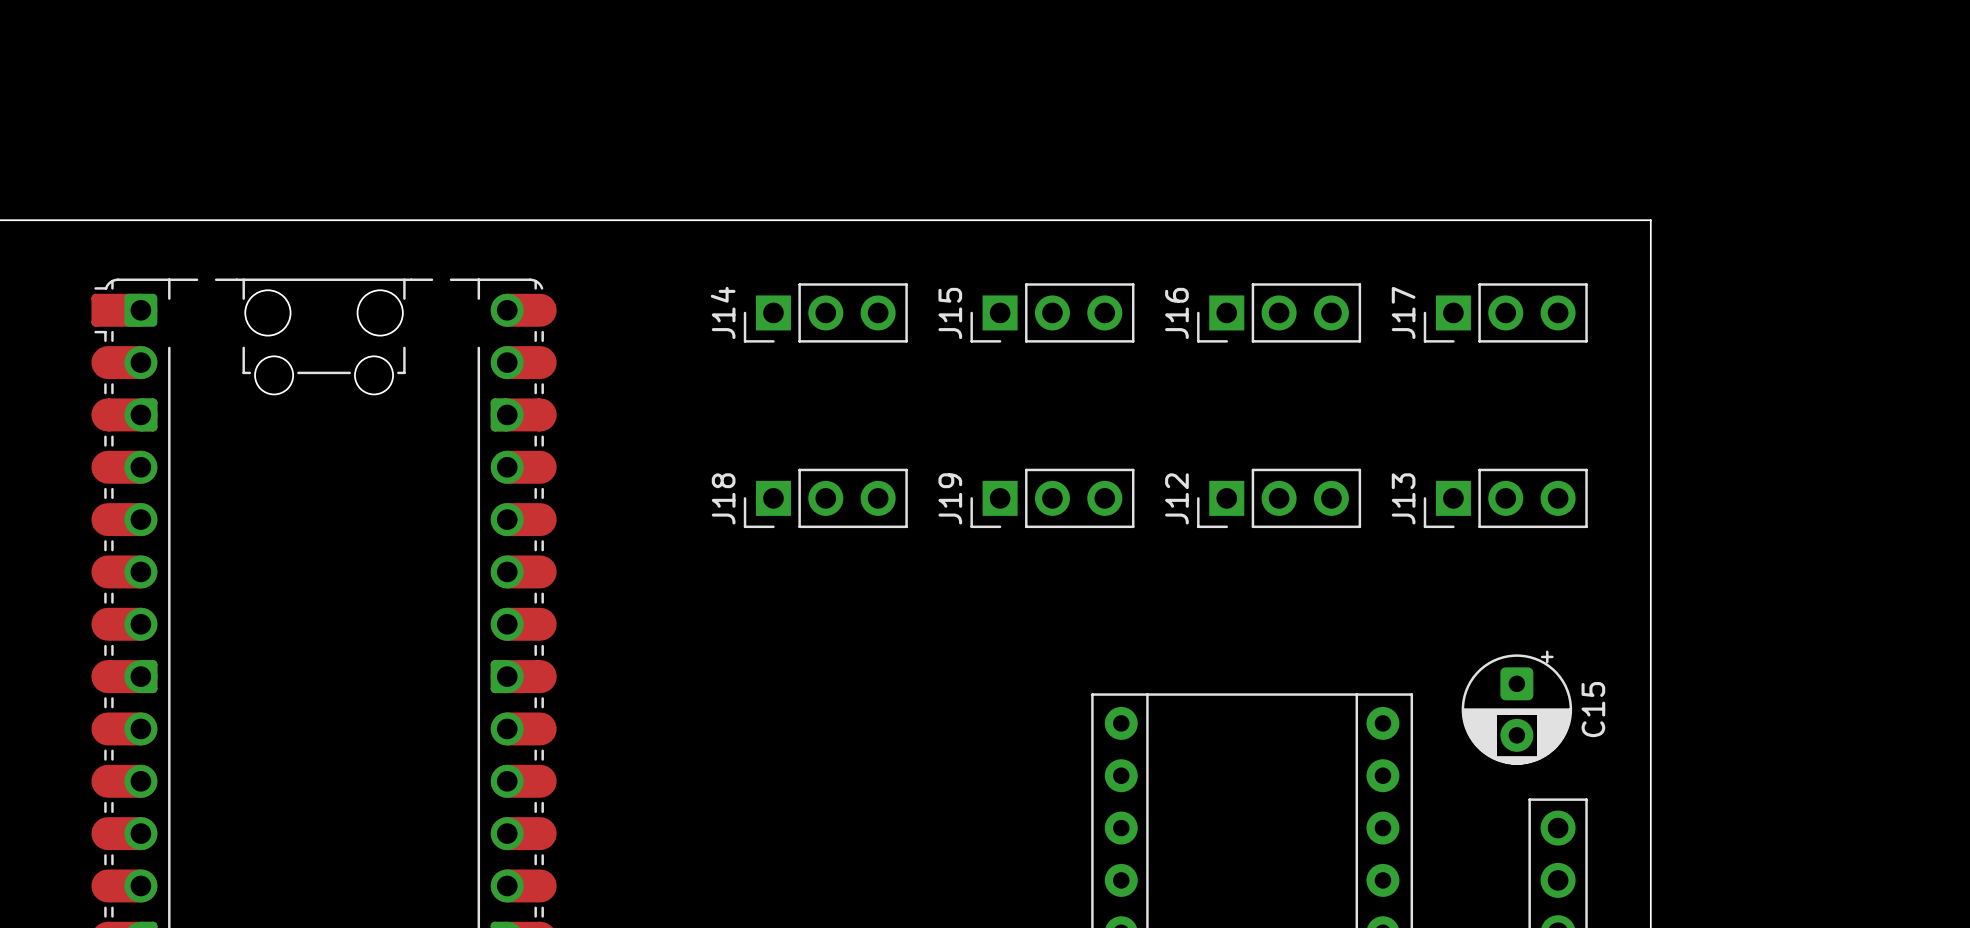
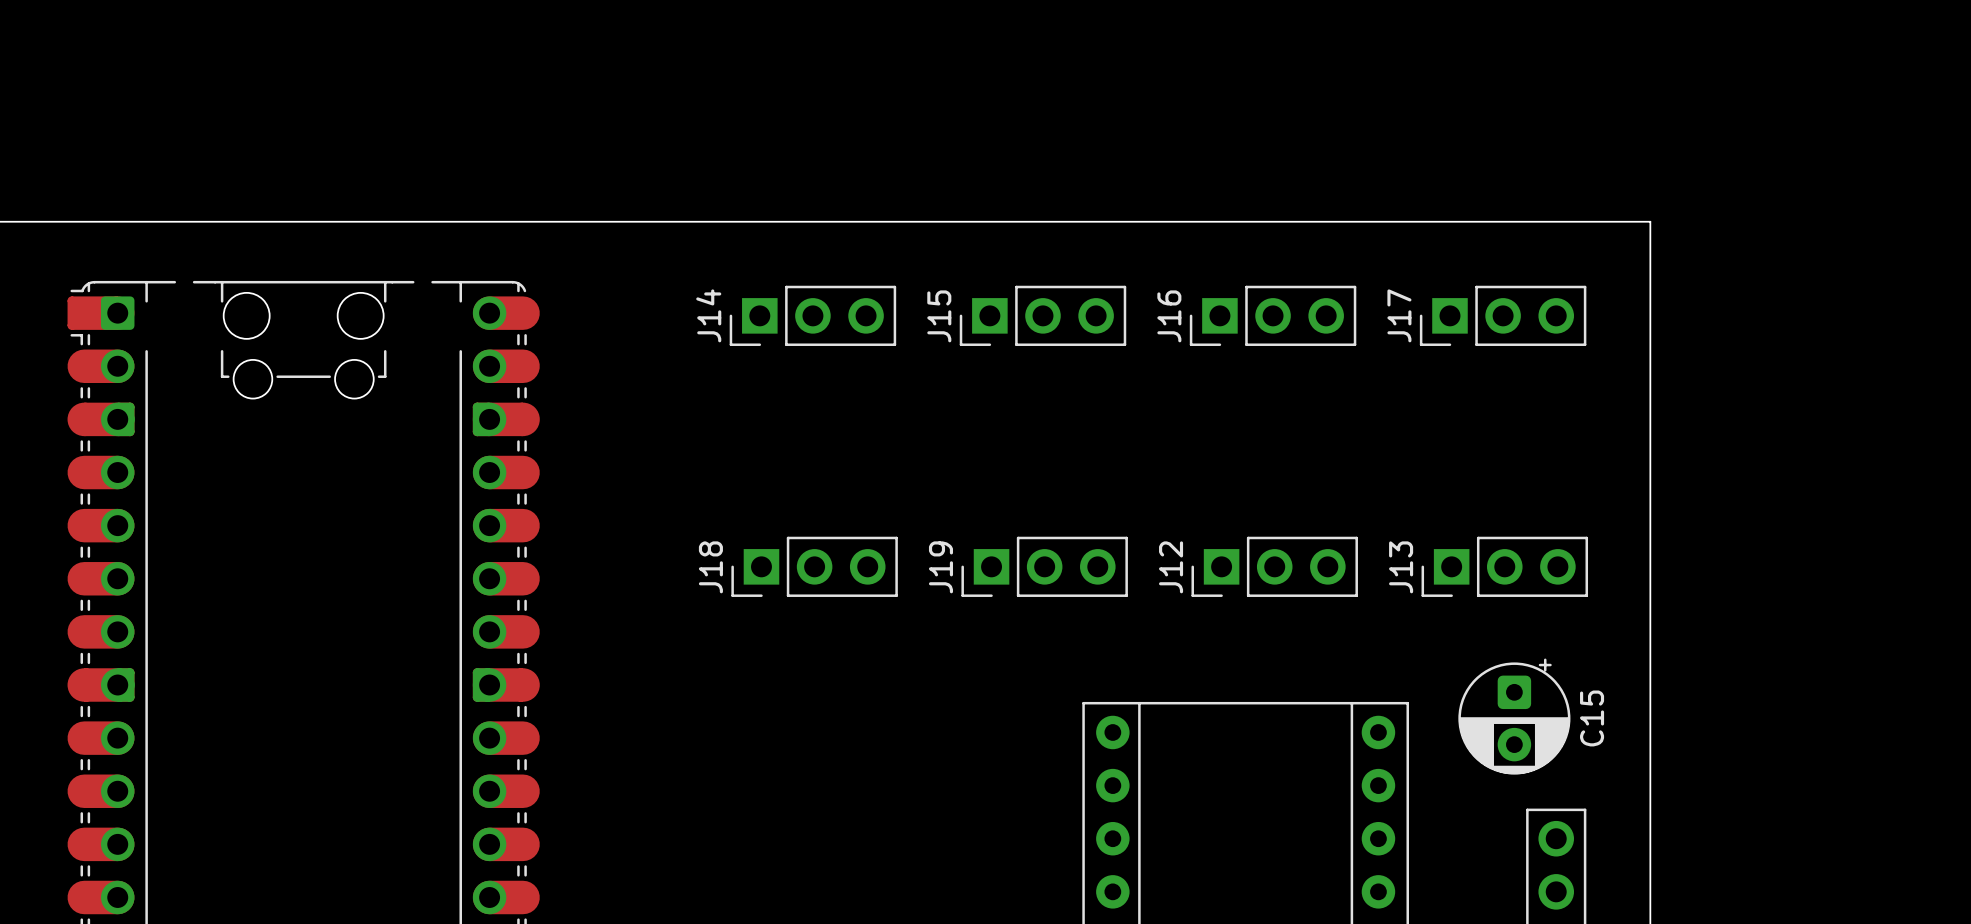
J18 position: (825, 498) -> (814, 566)
J19 position: (1052, 498) -> (1044, 566)
J12 position: (1279, 498) -> (1274, 566)
J13 position: (1505, 498) -> (1504, 566)

